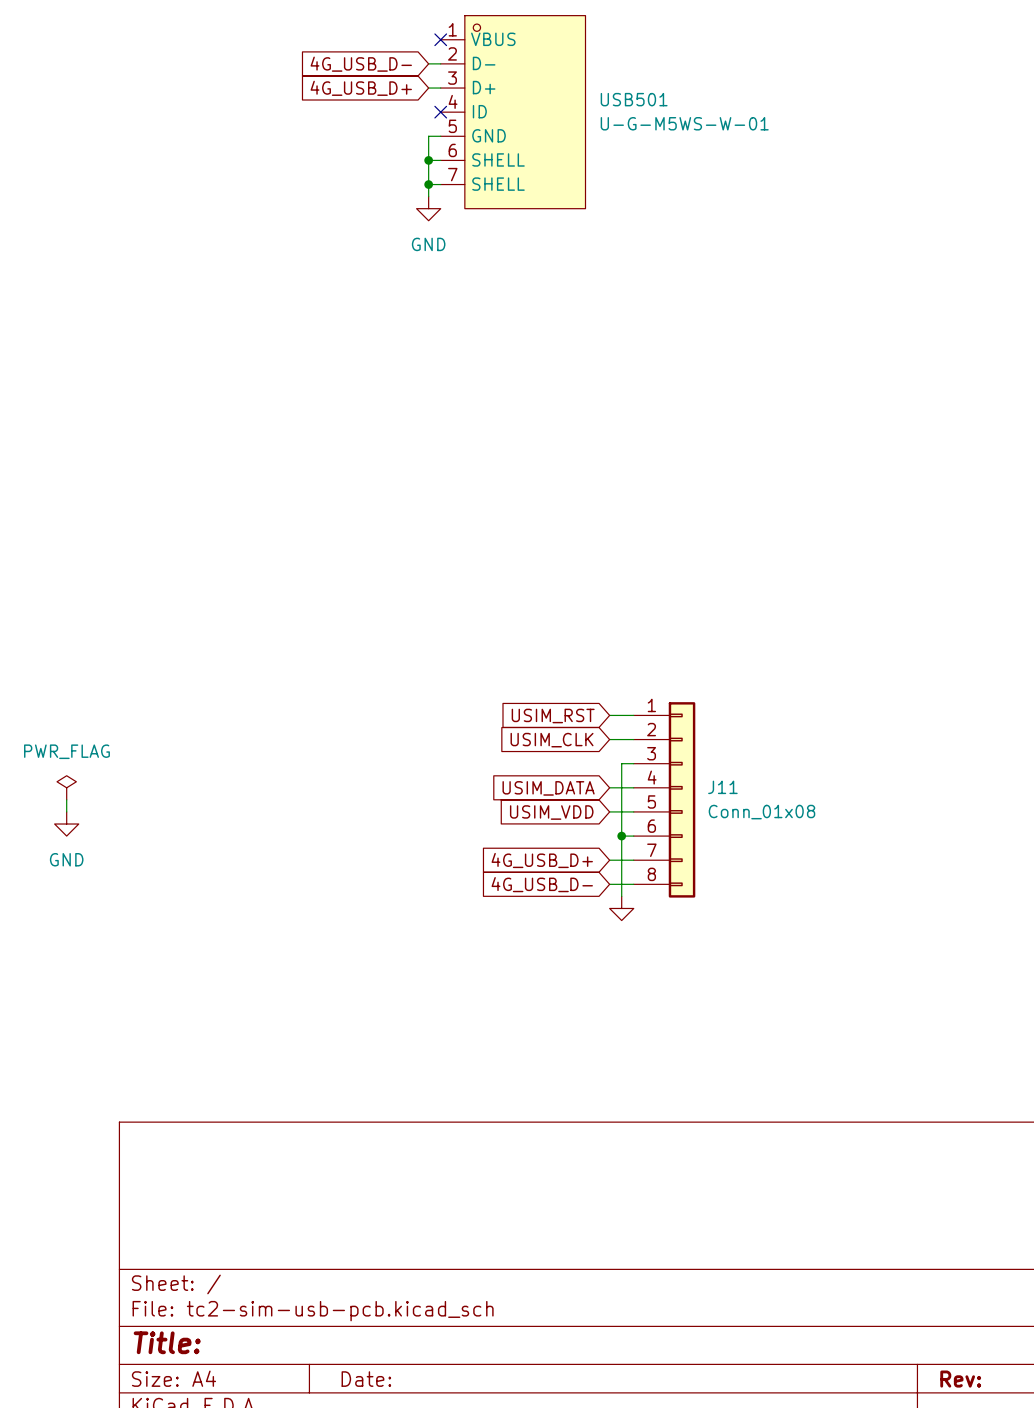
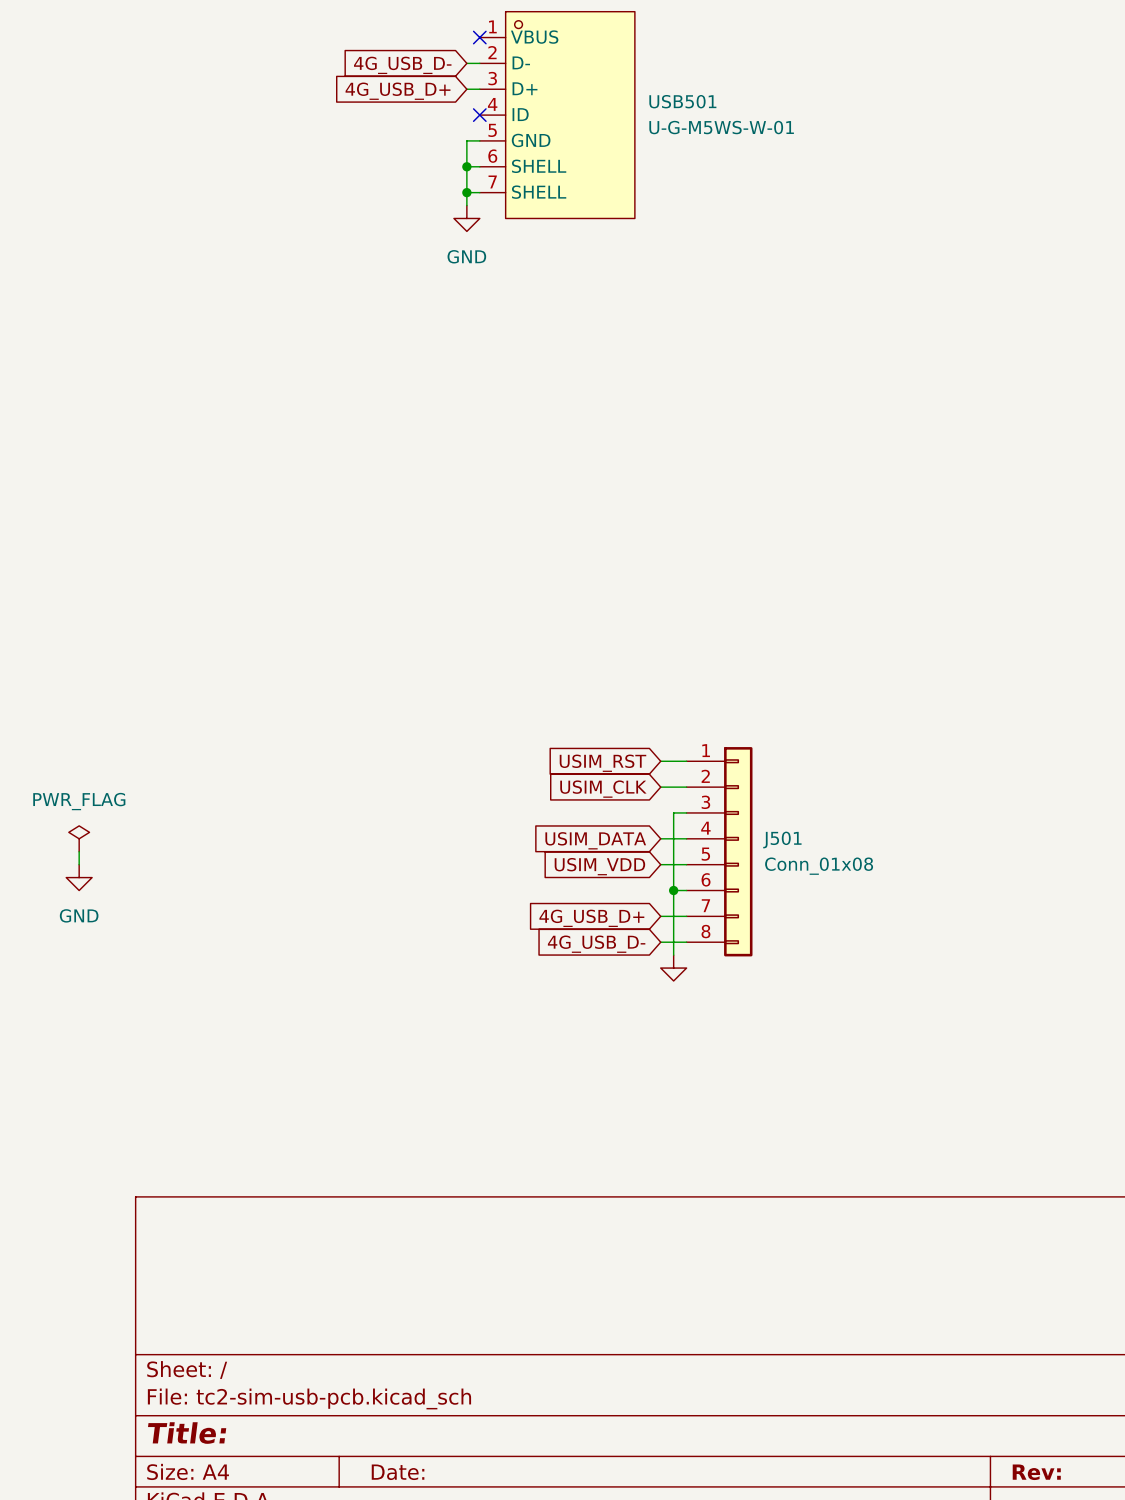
J11 name: J11 (722, 787) -> J501 (782, 839)

